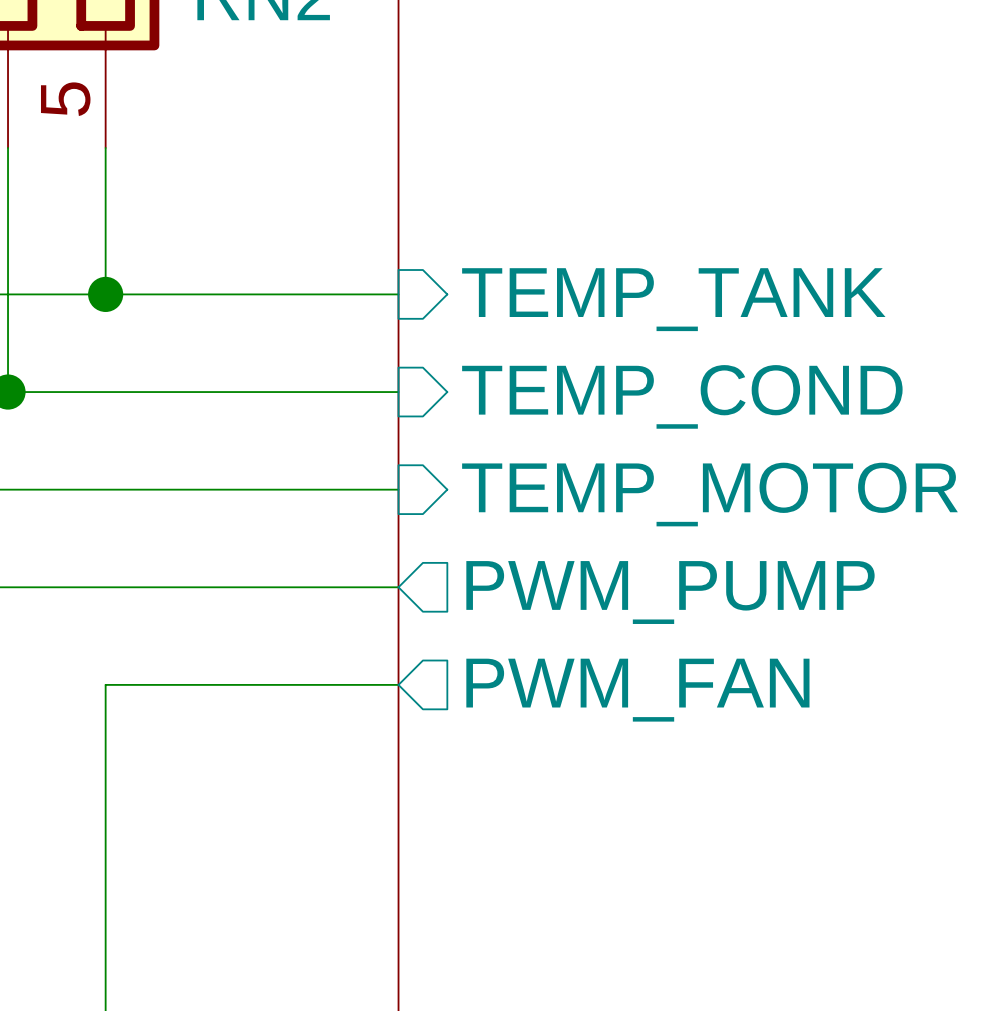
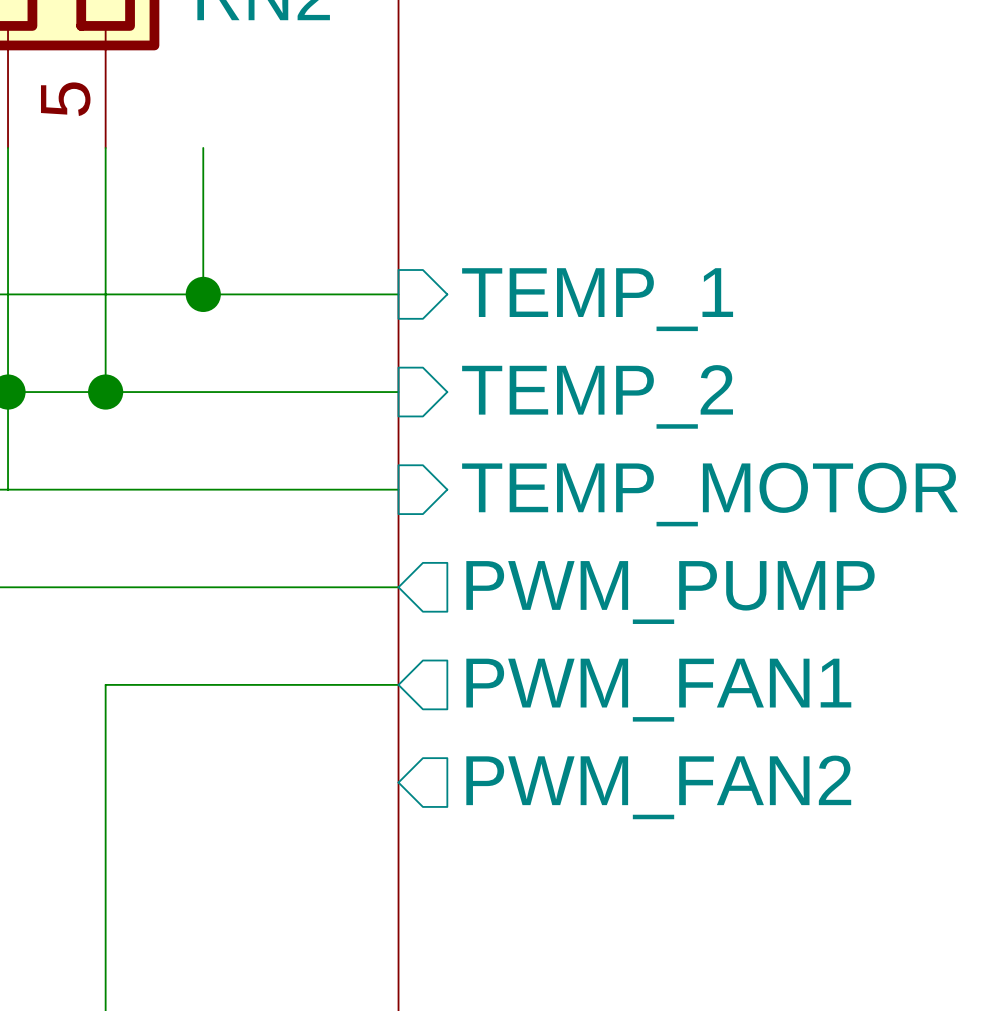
wire: none -> (203, 147) (203, 294)
wire: none -> (105, 294) (105, 392)
junction: (105, 294) -> none
junction: none -> (203, 294)
sheet pin: TEMP_TANK (673, 299) -> TEMP_1 (597, 299)
wire: none -> (8, 392) (8, 489)
junction: none -> (105, 392)
sheet pin: TEMP_COND (682, 396) -> TEMP_2 (597, 396)
sheet pin: PWM_FAN (637, 690) -> PWM_FAN1 (658, 690)
sheet pin: none -> PWM_FAN2 (658, 787)

